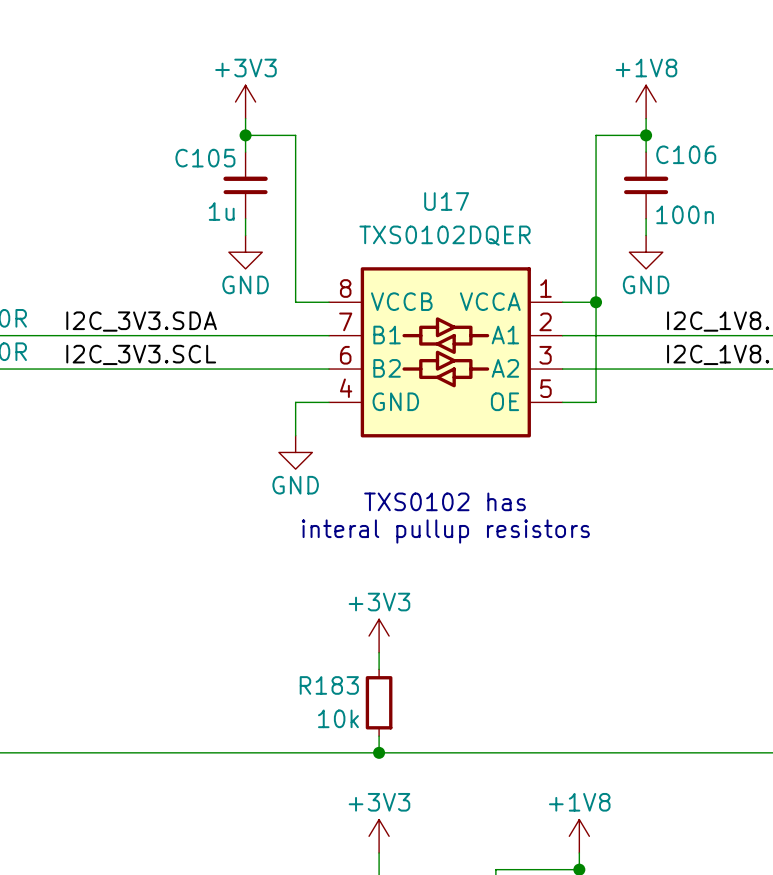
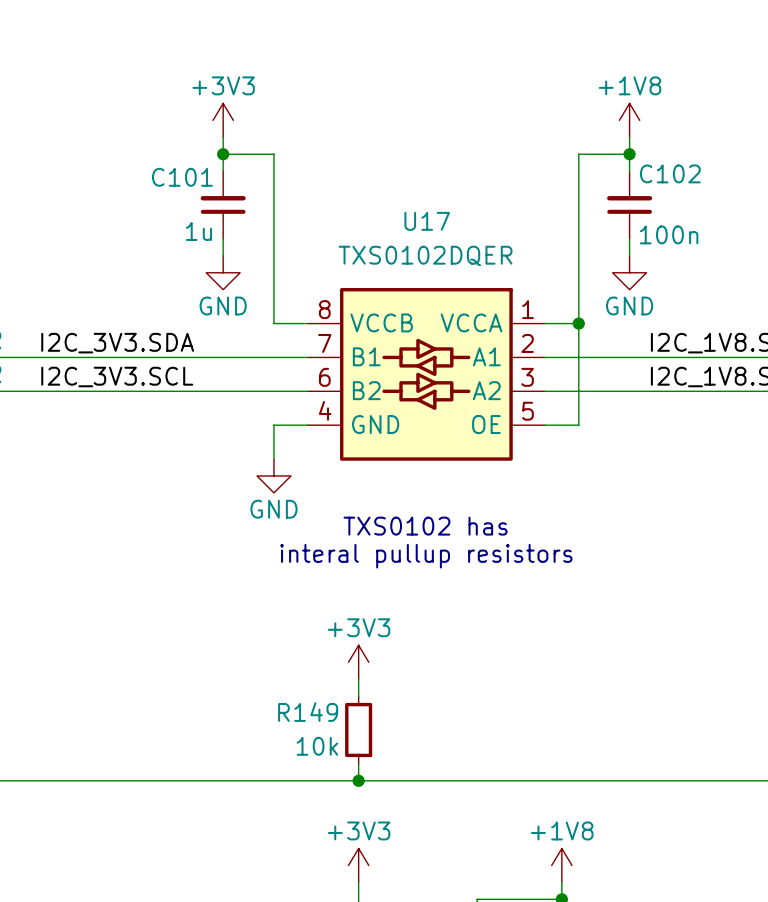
C106 name: C106 (686, 154) -> C102 (670, 173)
C105 name: C105 (205, 158) -> C101 (182, 177)
R183 name: R183 (329, 685) -> R149 (308, 712)

